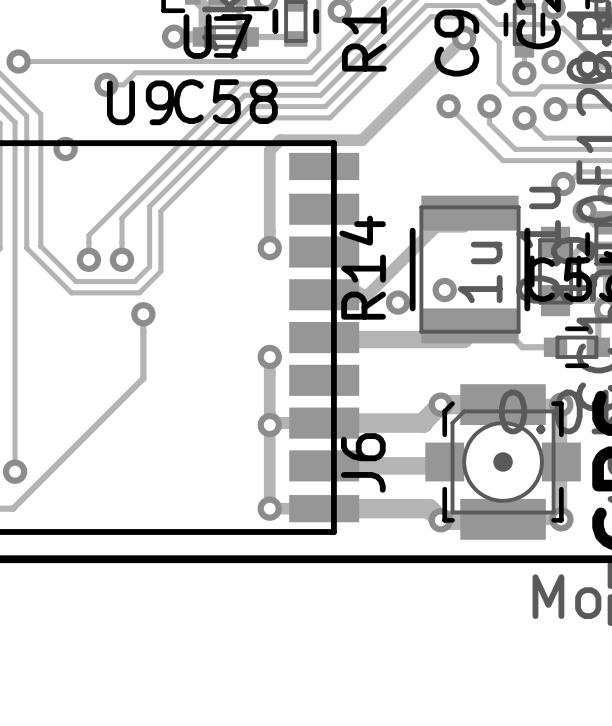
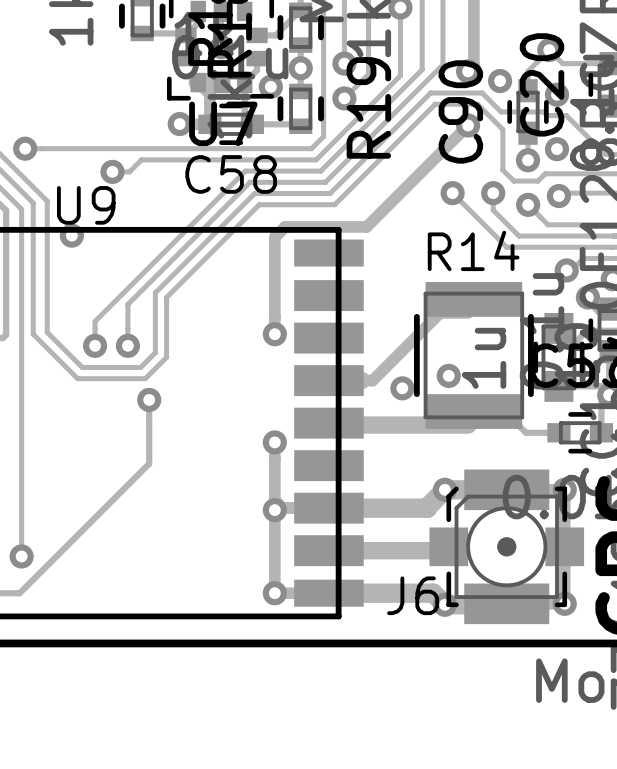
C58 name position: C58 (225, 101) -> C58 (231, 174)
U9 name position: U9 (140, 102) -> U9 (86, 205)
R14 name rotation: 0° (362, 267) -> 90° clockwise (473, 250)
R14 name position: R14 (362, 267) -> R14 (473, 250)
J6 name rotation: 0° (363, 462) -> 90° clockwise (413, 595)

